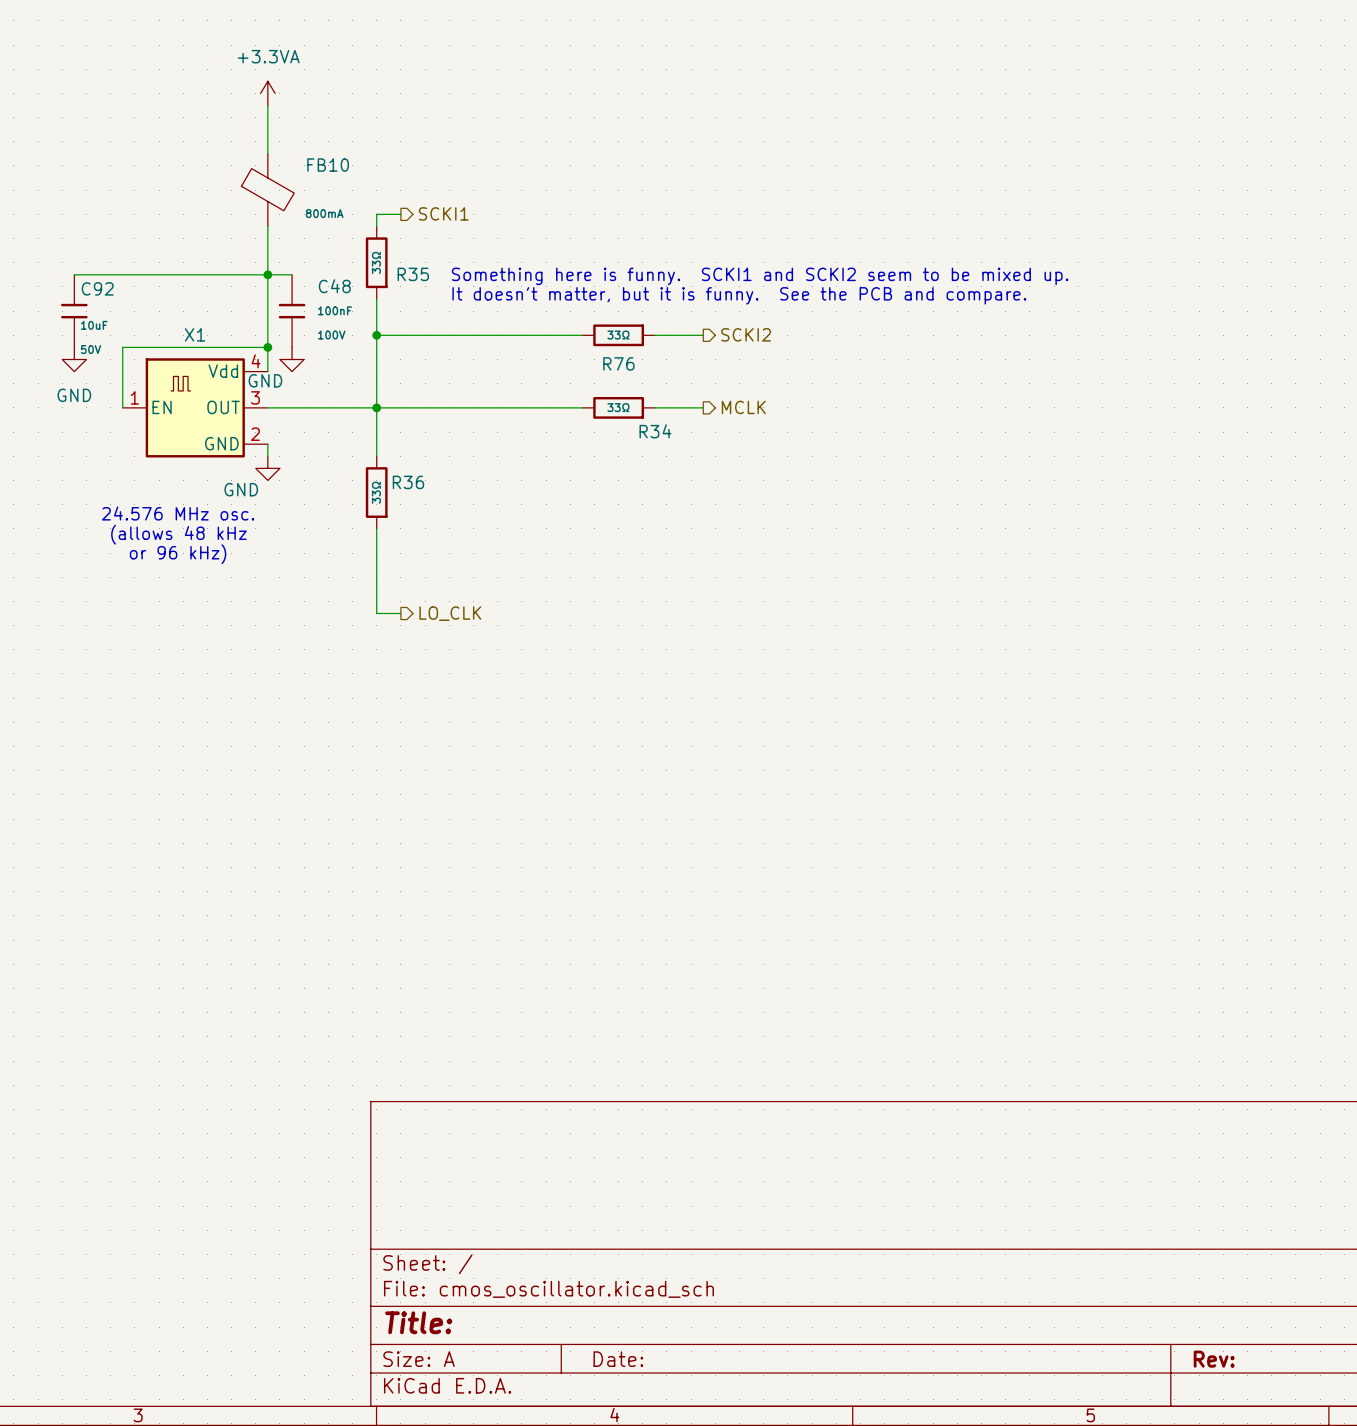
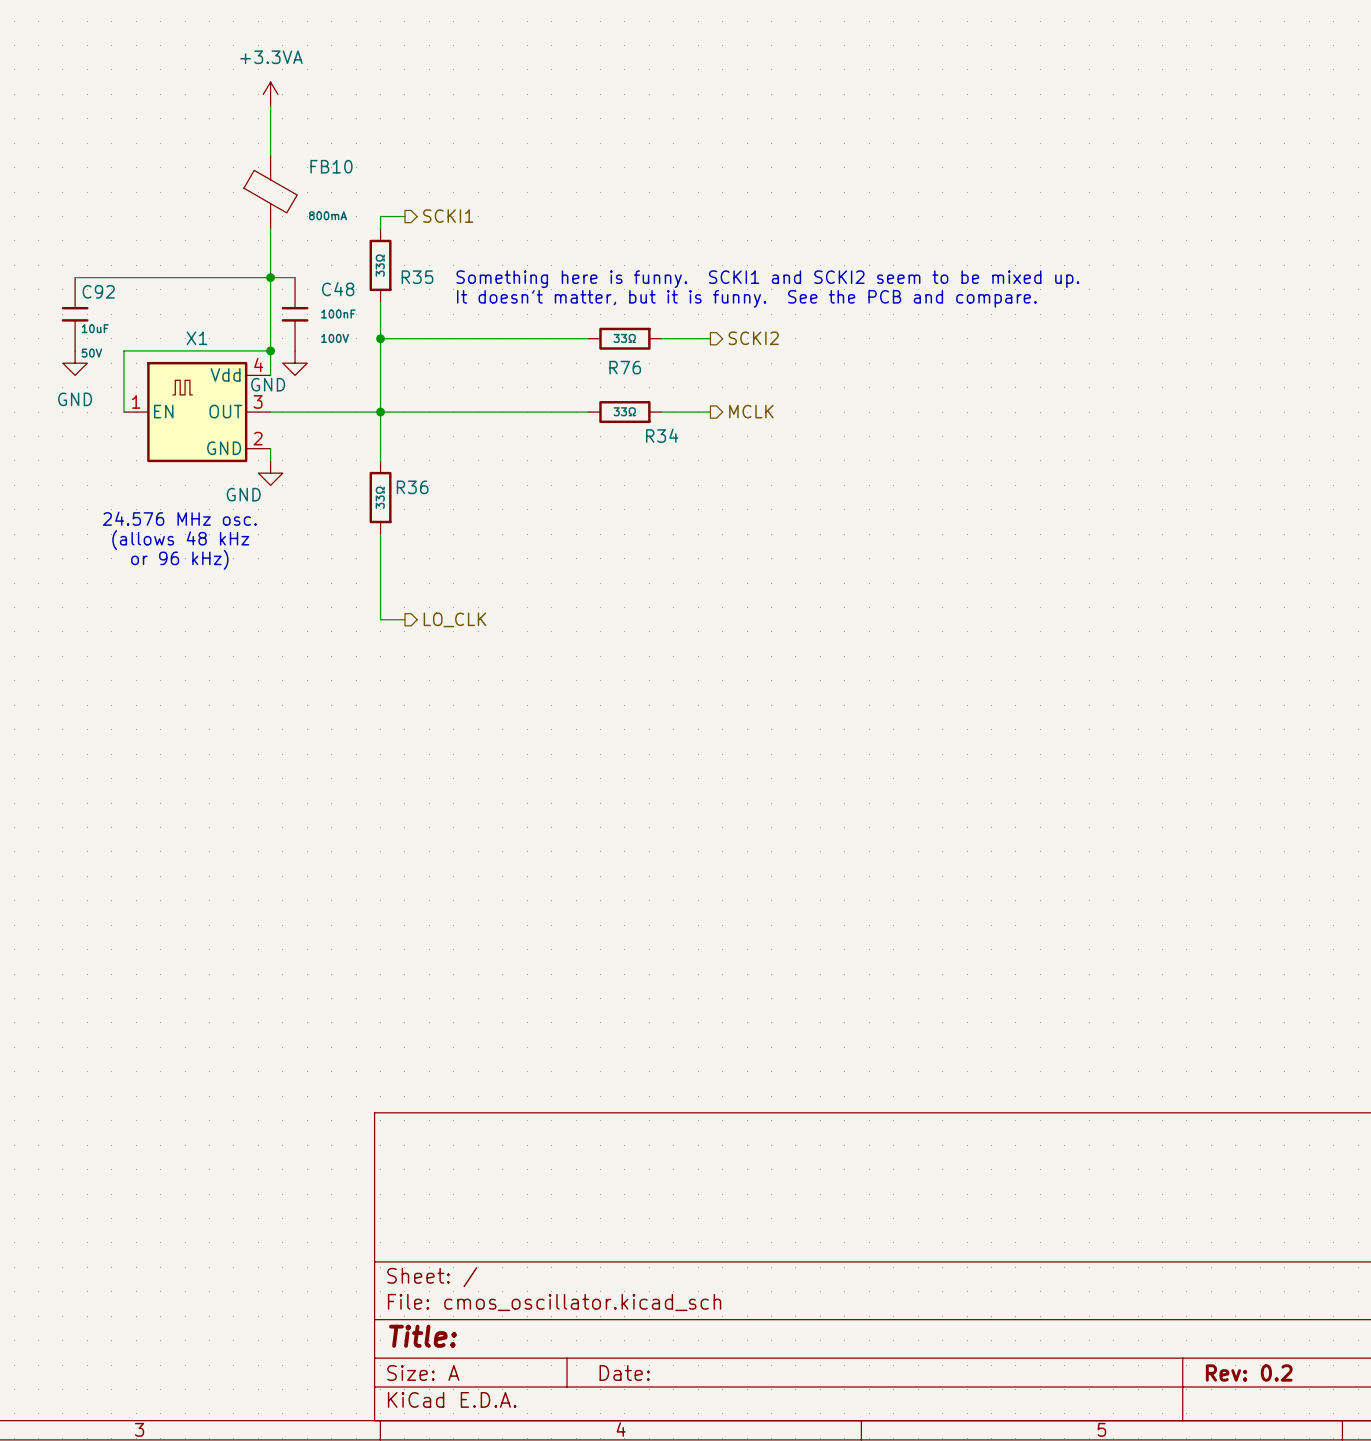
title block: Rev: (1214, 1359) -> Rev: 0.2 (1249, 1372)

